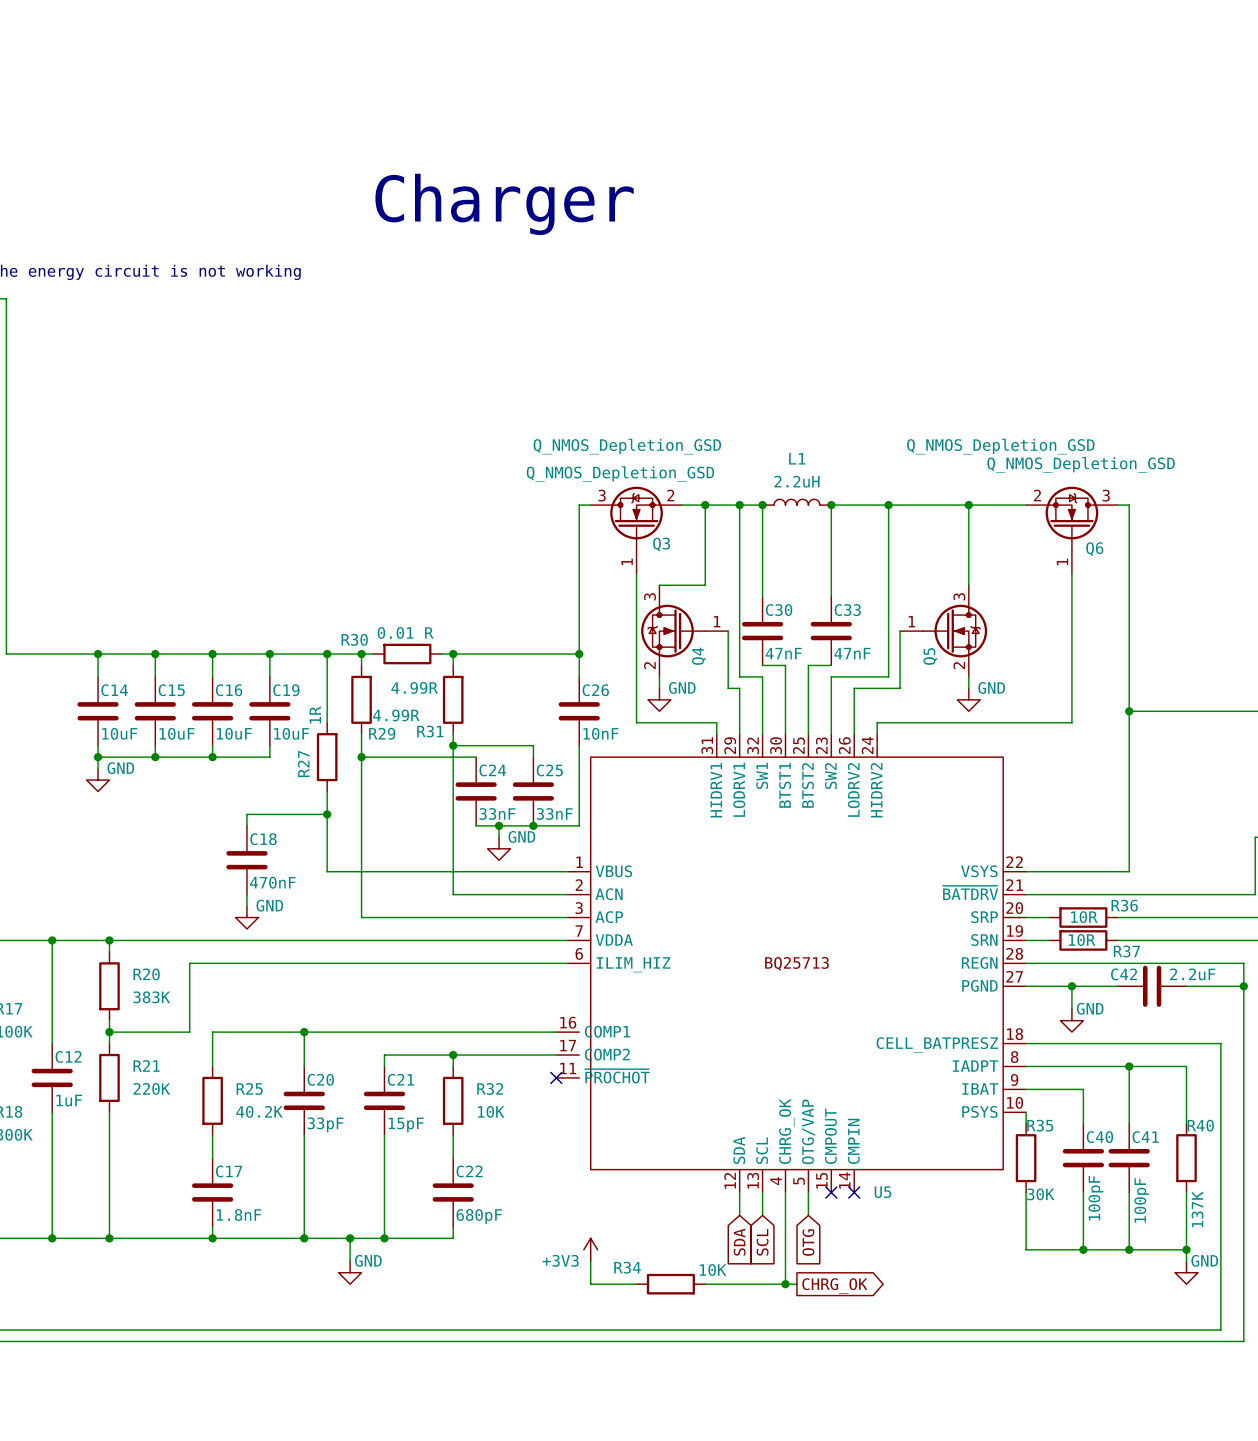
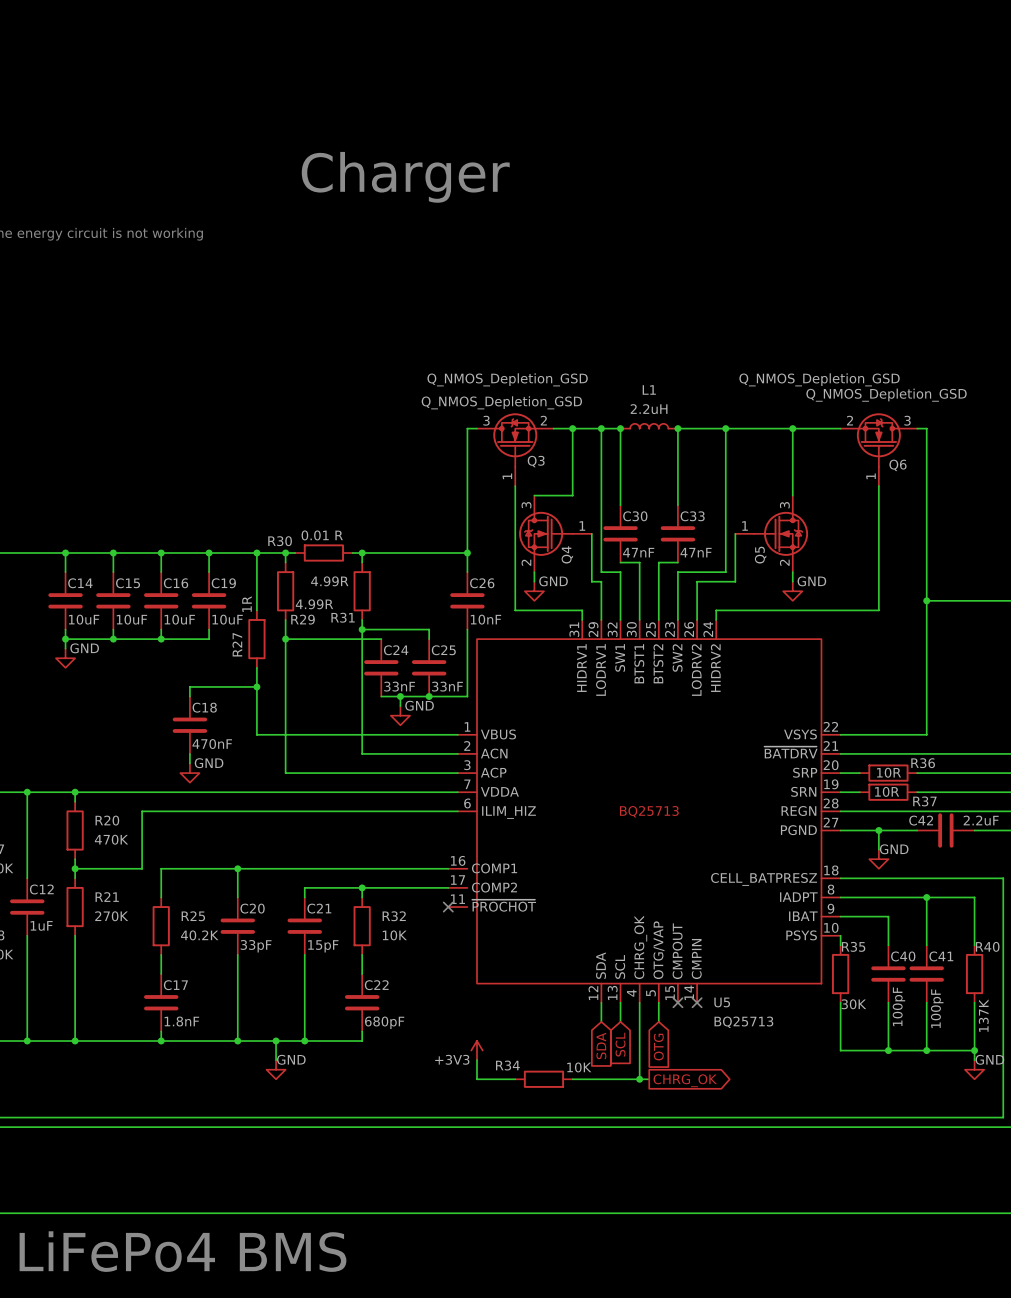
R20 value: 383K (151, 997) -> 470K (111, 839)
R21 value: 220K (151, 1088) -> 270K (111, 916)
U5 value: none -> BQ25713 (743, 1022)

